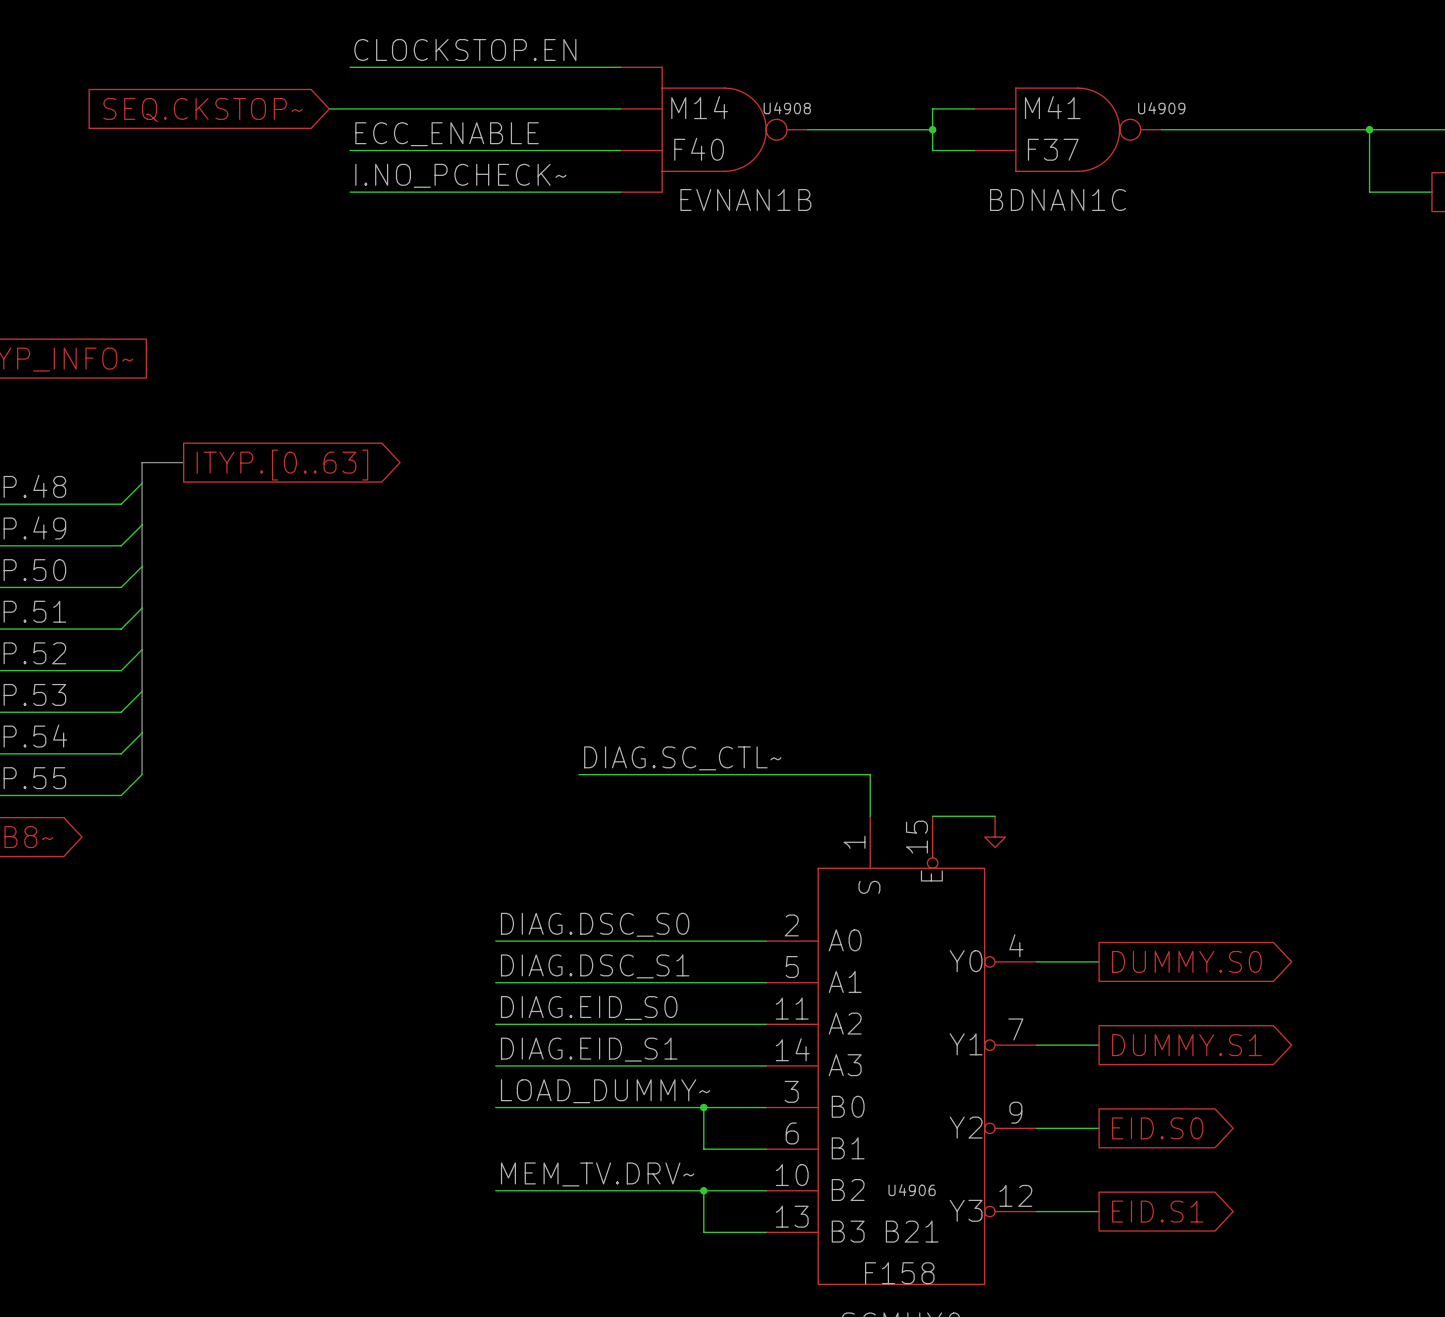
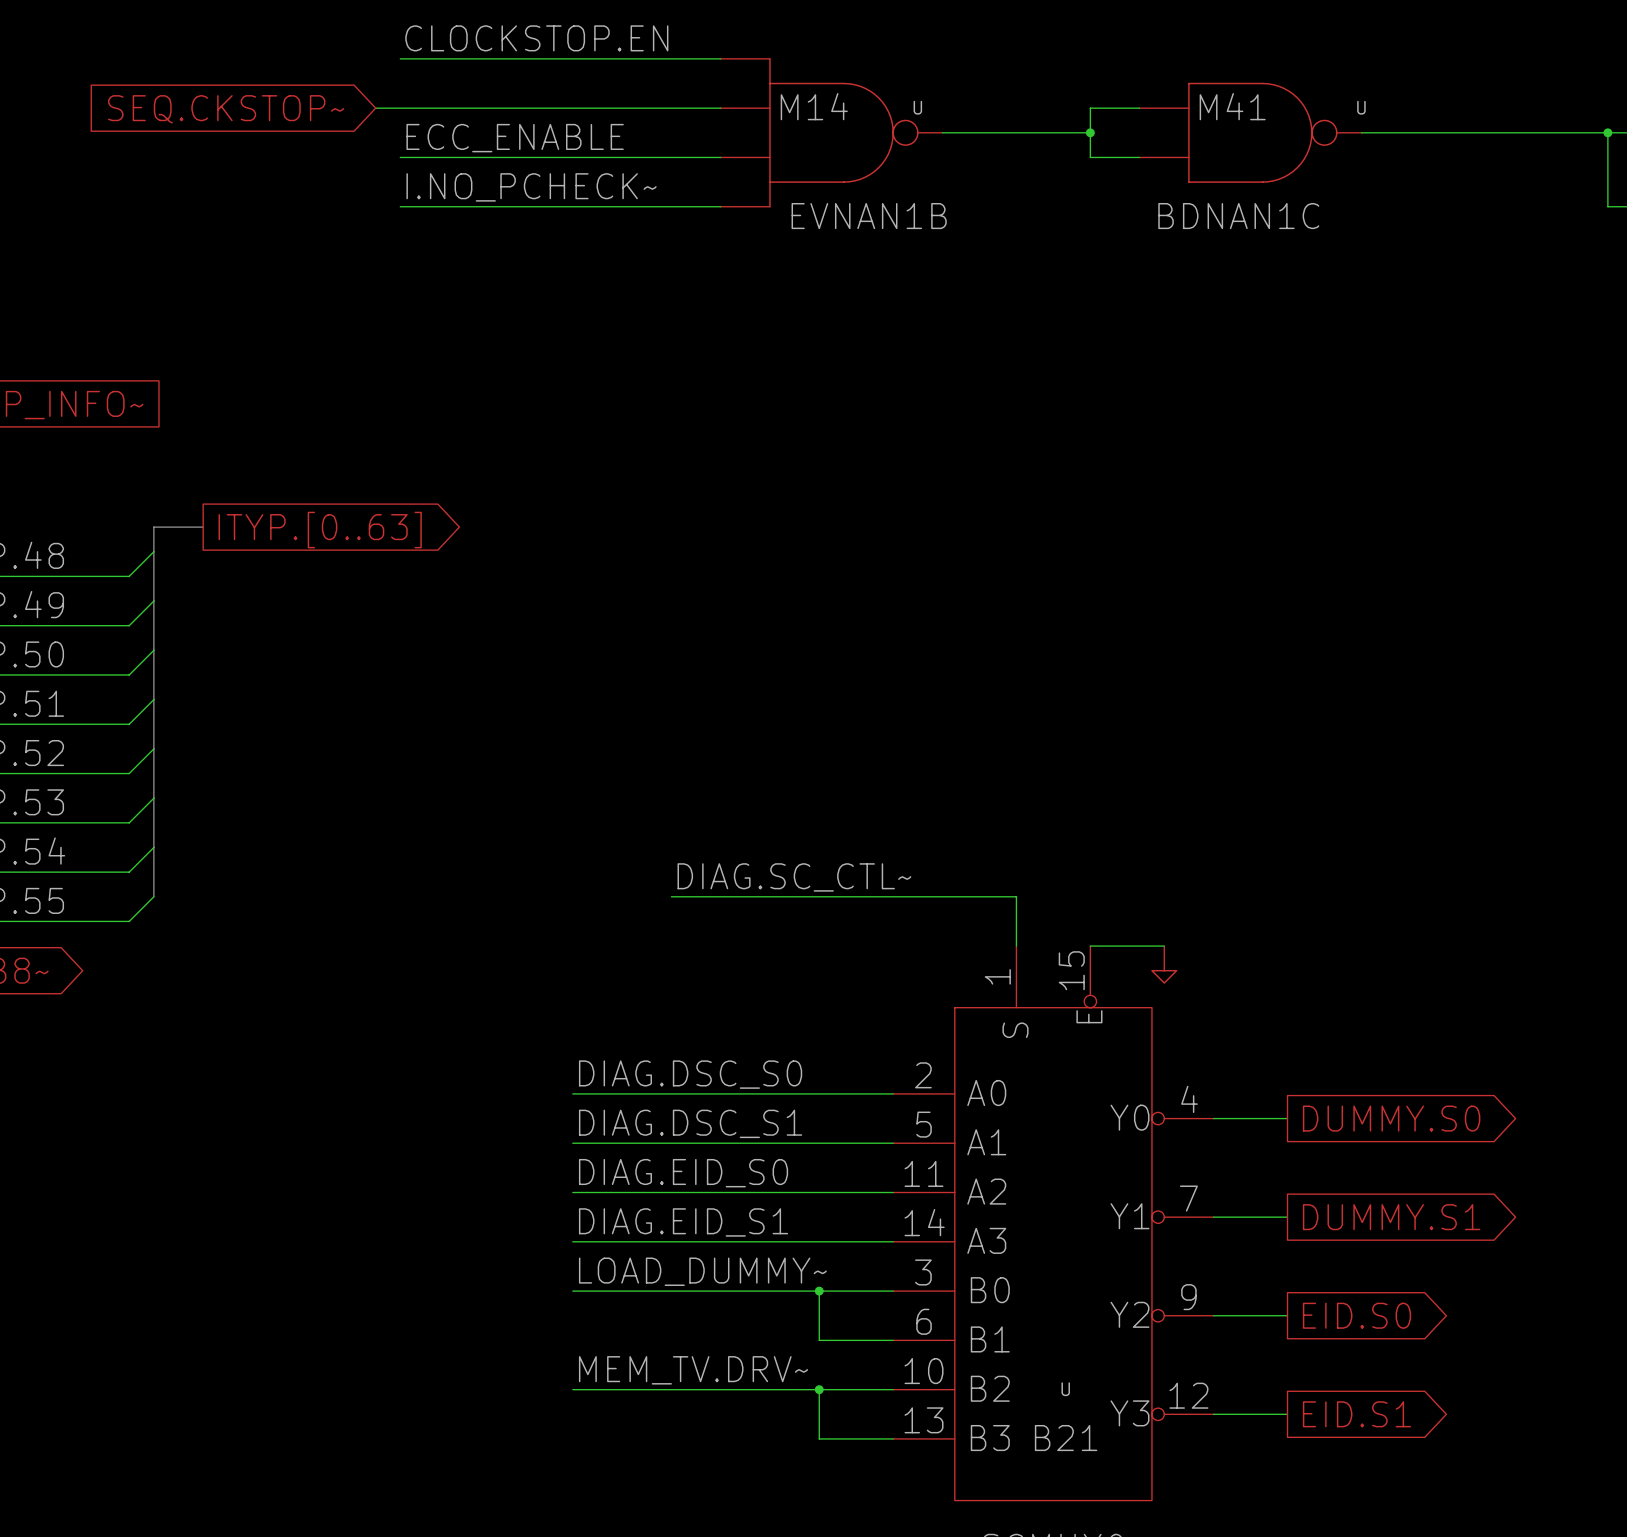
U4908 name: U4908 (787, 108) -> U (917, 107)
U4909 name: U4909 (1161, 108) -> U (1361, 107)
U4908 value: F40 (699, 149) -> none
U4909 value: F37 (1053, 149) -> none
U4906 name: U4906 (912, 1190) -> U (1065, 1389)
U4906 value: F158 (899, 1273) -> none

